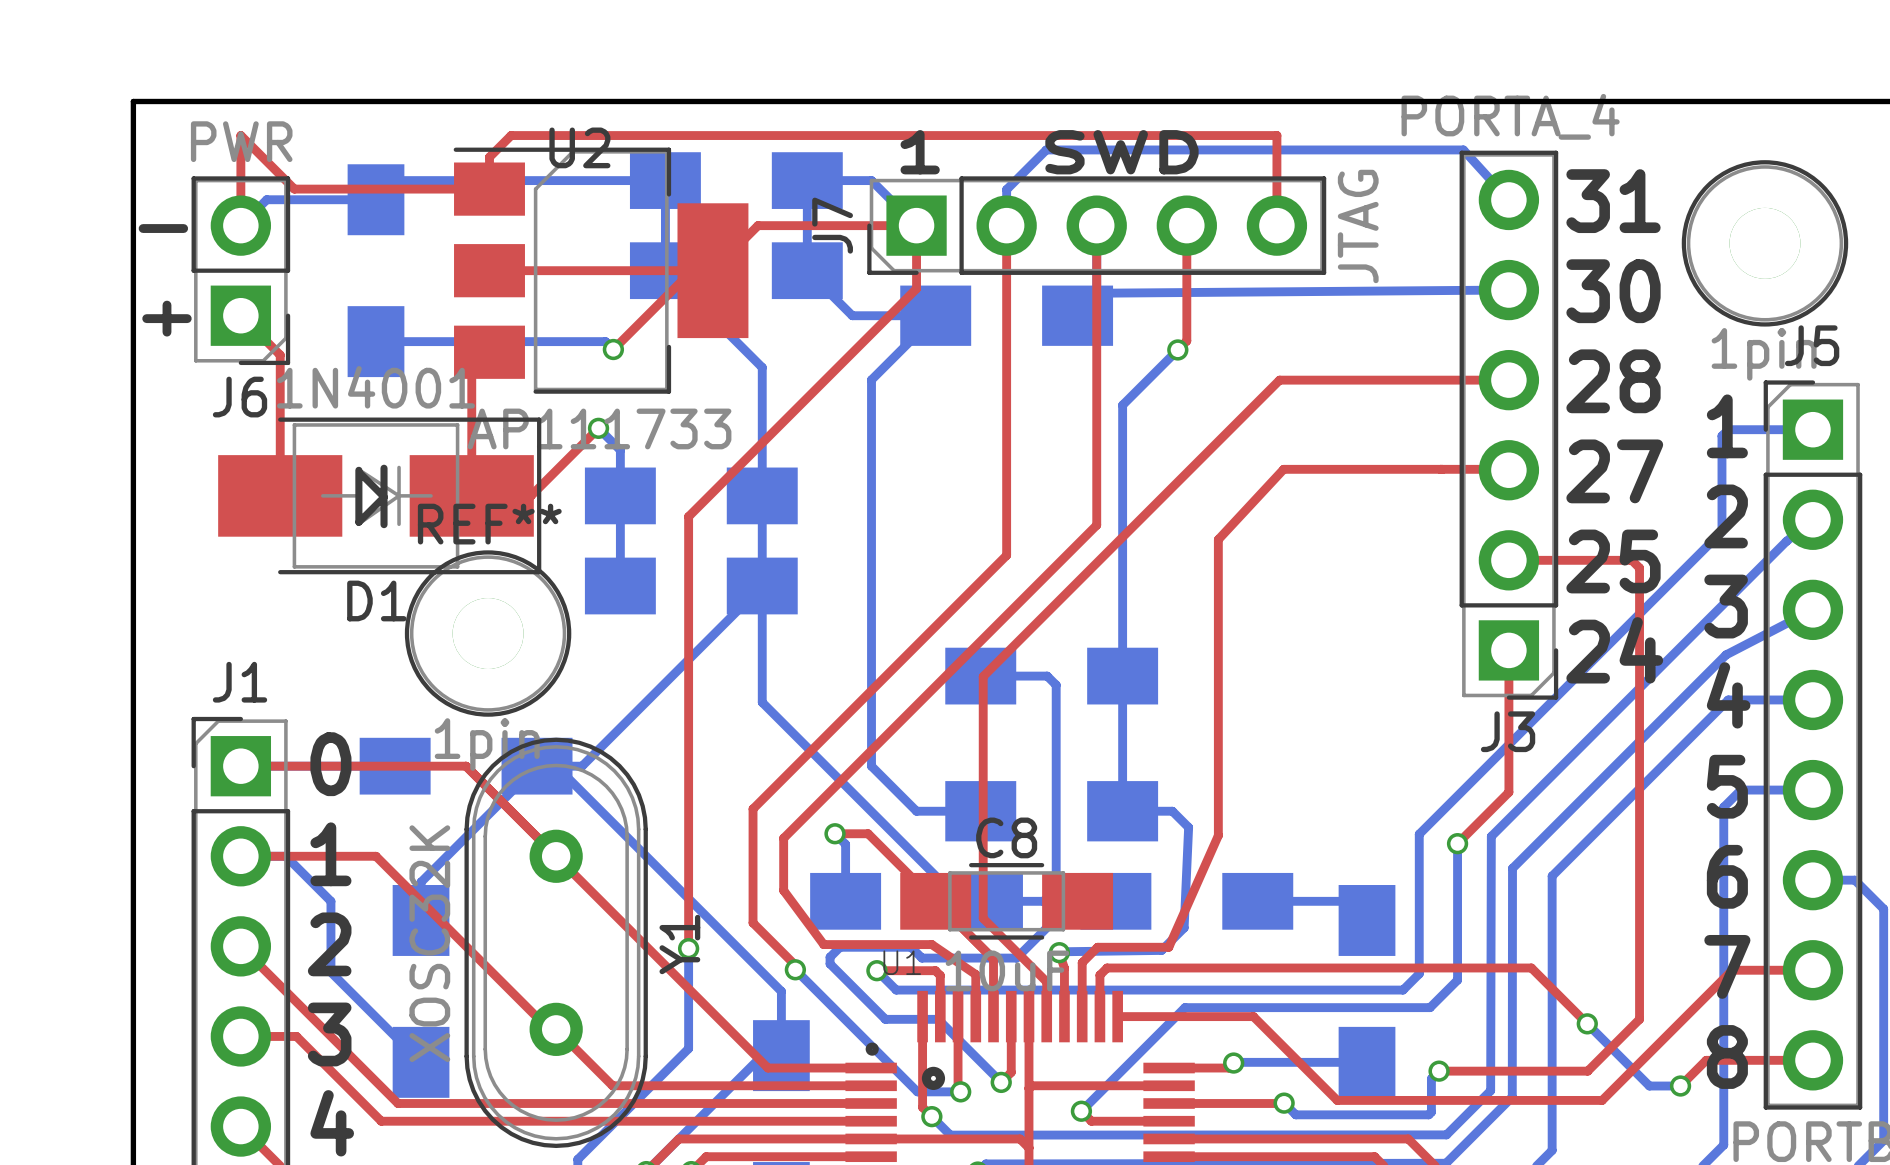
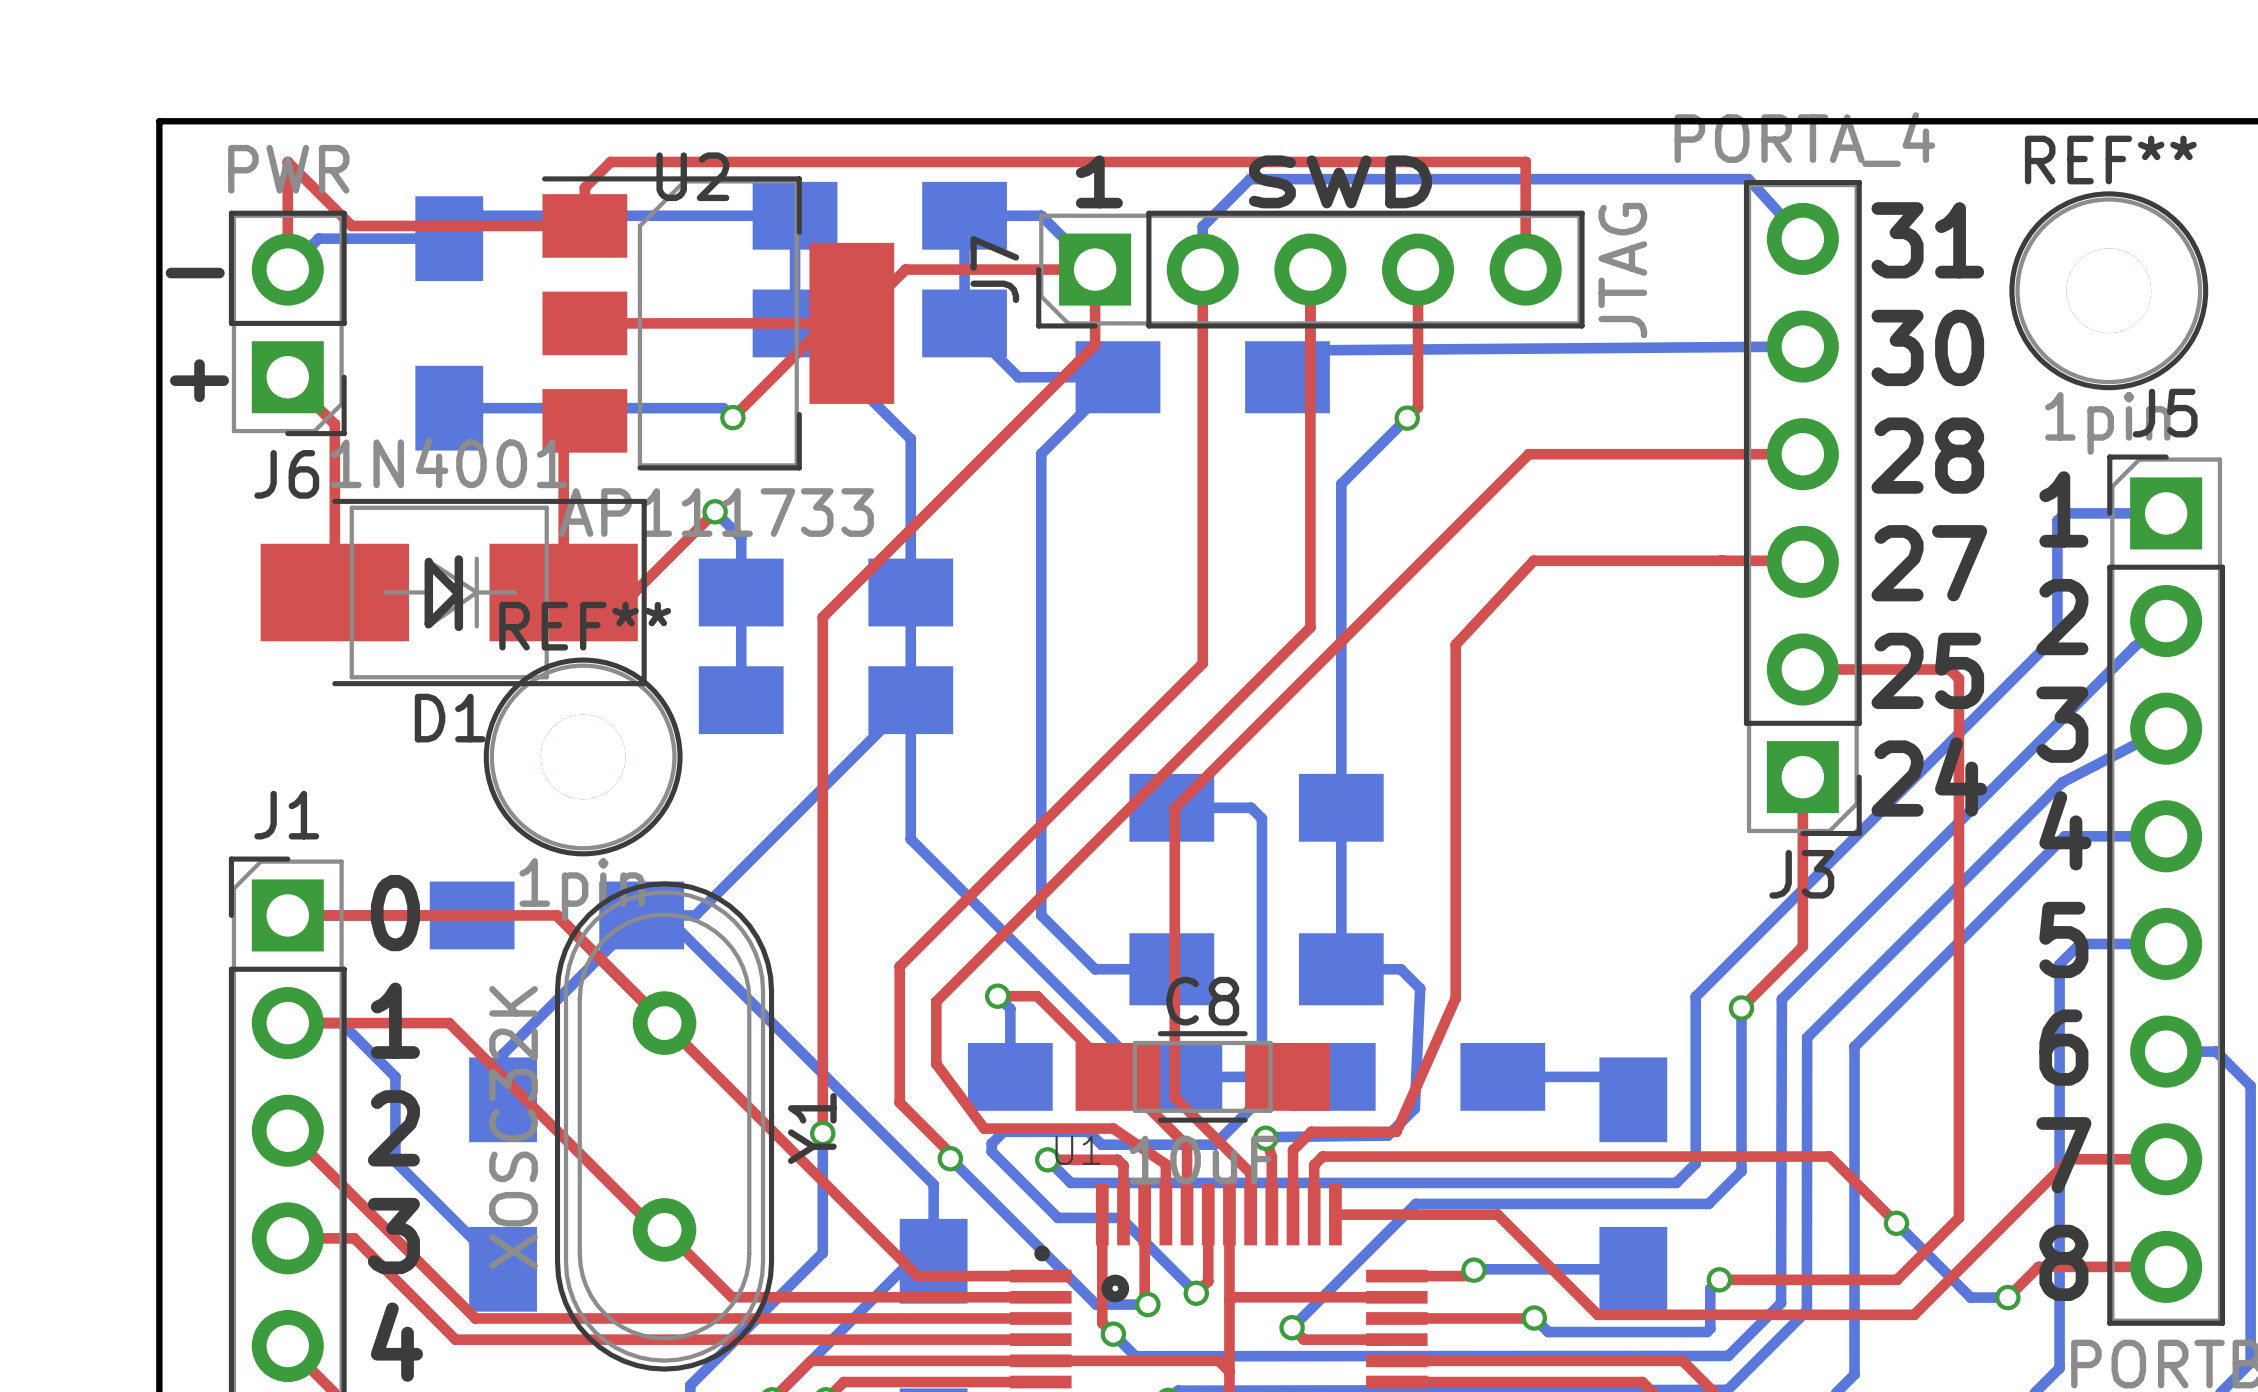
REF** name: none -> REF** (2110, 160)

